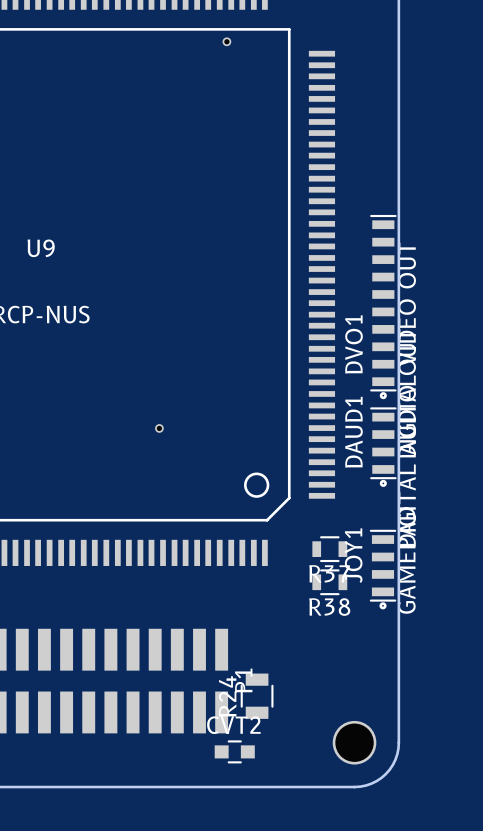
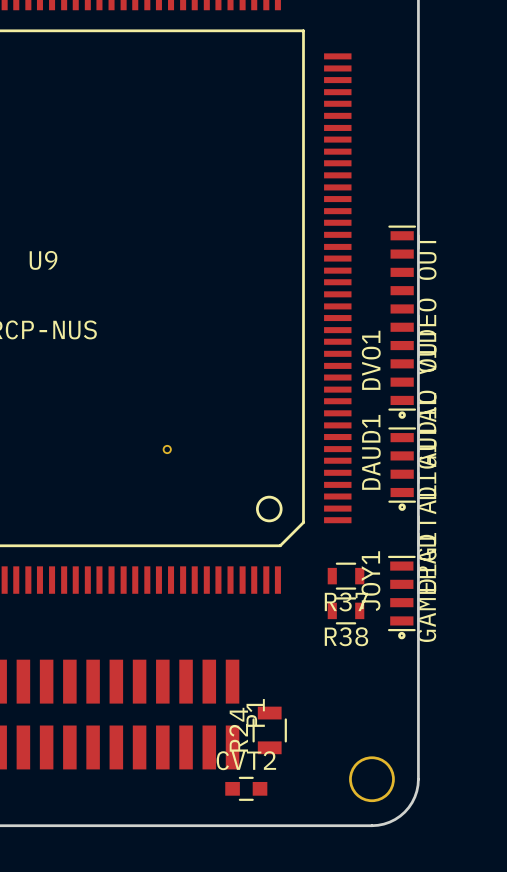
part: (226, 41) -> none

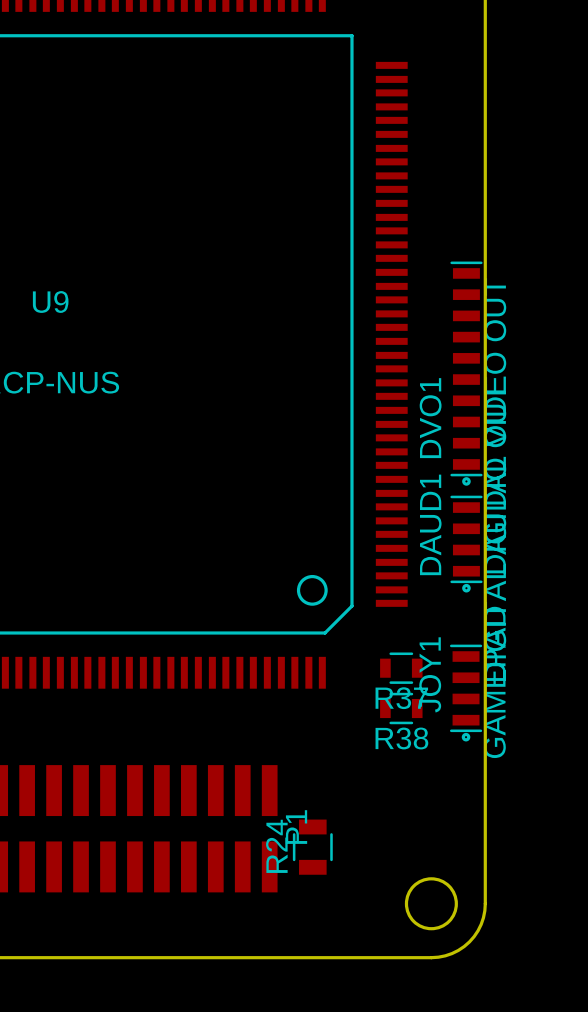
part: (167, 449) -> none
CVT2: (246, 788) -> none

